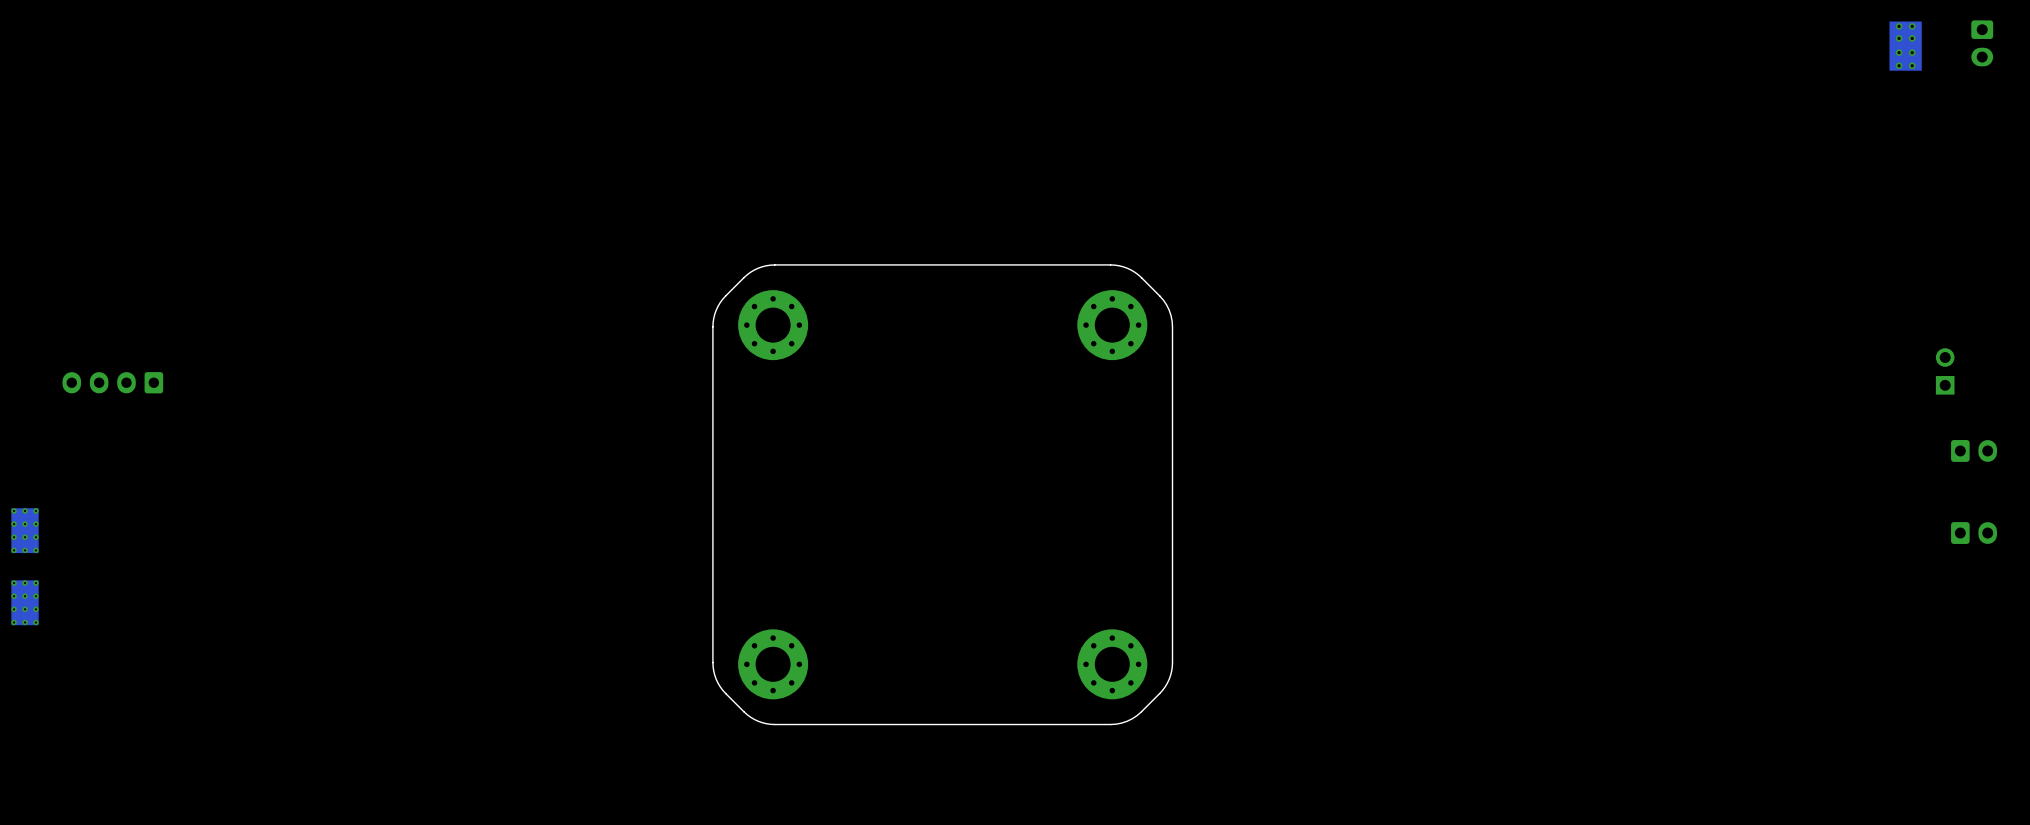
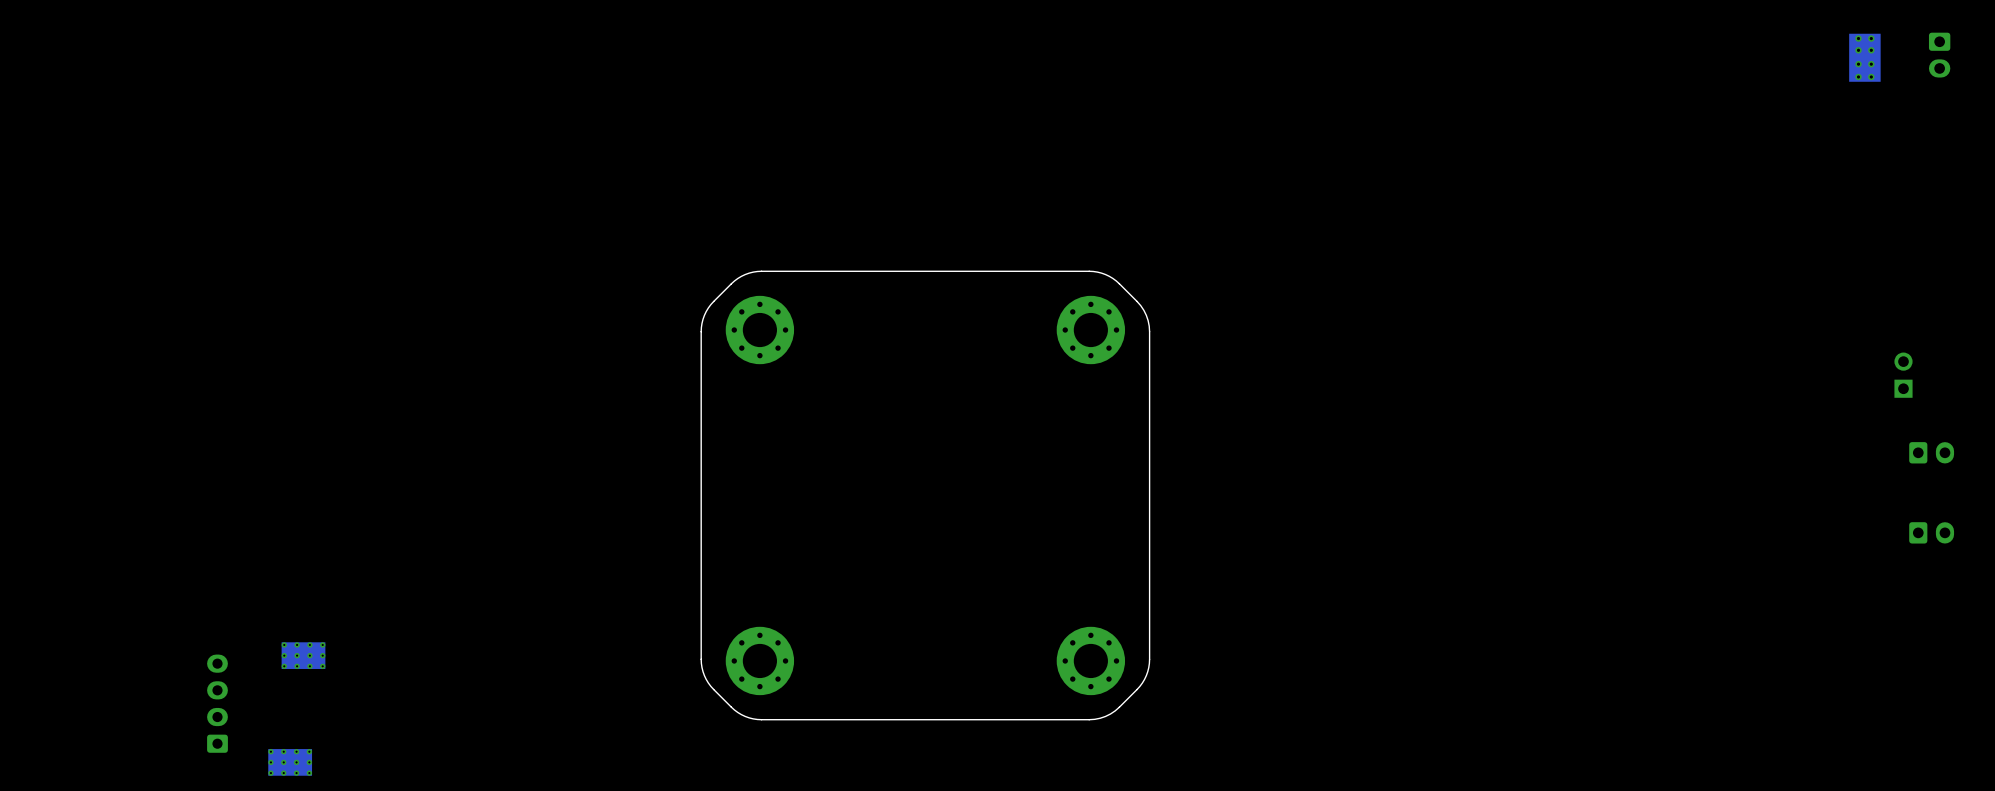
part: (112, 382) -> none
part: (25, 530) -> none
part: (25, 602) -> none
part: none -> (303, 655)
part: none -> (217, 703)
part: none -> (290, 762)

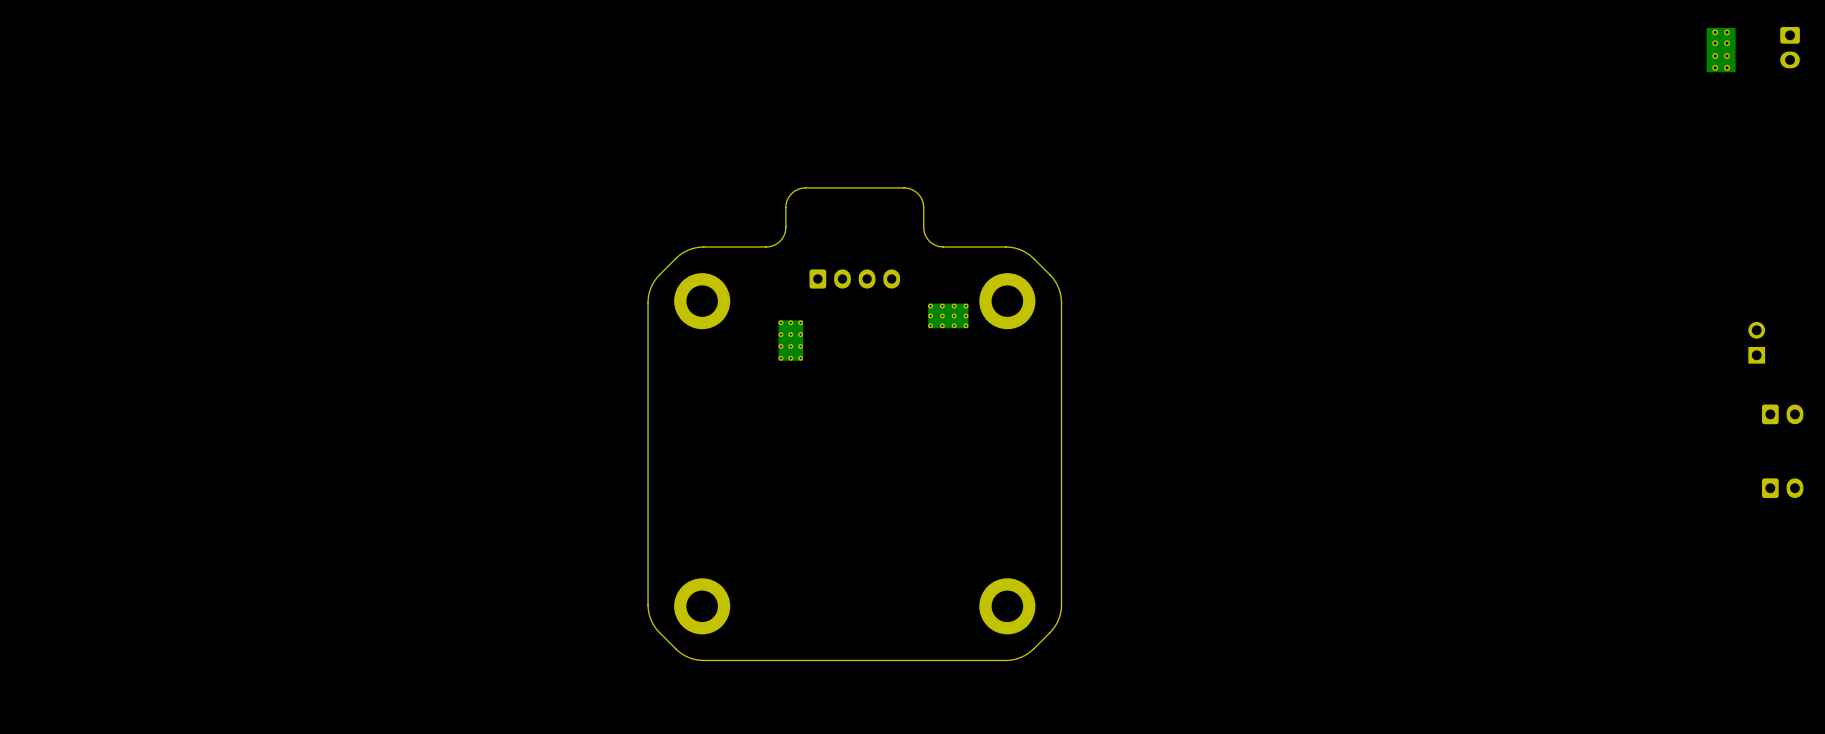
board edge: (1021, 271) (829, 271) -> (943, 246) (932, 243) (925, 235) (923, 205) (920, 197) (912, 189) (903, 187) (805, 187) (797, 189) (790, 195) (786, 203) (783, 235) (776, 243) (766, 246)
part footprint: [725, 295, 795, 365] -> [674, 273, 731, 330]
part footprint: [1056, 295, 1126, 365] -> [979, 273, 1036, 330]
part: none -> (854, 278)
part: none -> (948, 315)
part: none -> (790, 340)
part footprint: [725, 626, 795, 696] -> [674, 578, 731, 635]
part footprint: [1056, 626, 1126, 696] -> [979, 578, 1036, 635]
part: (303, 655) -> none
part: (217, 703) -> none
part: (290, 762) -> none

